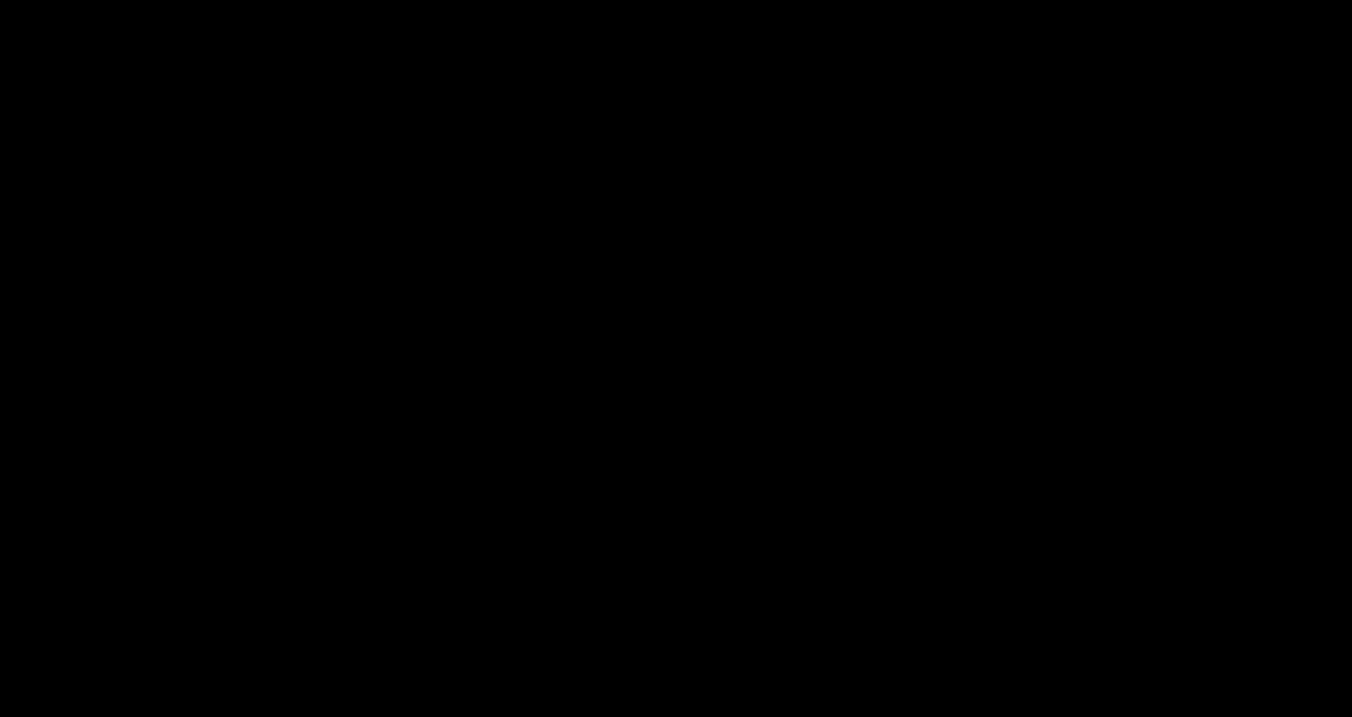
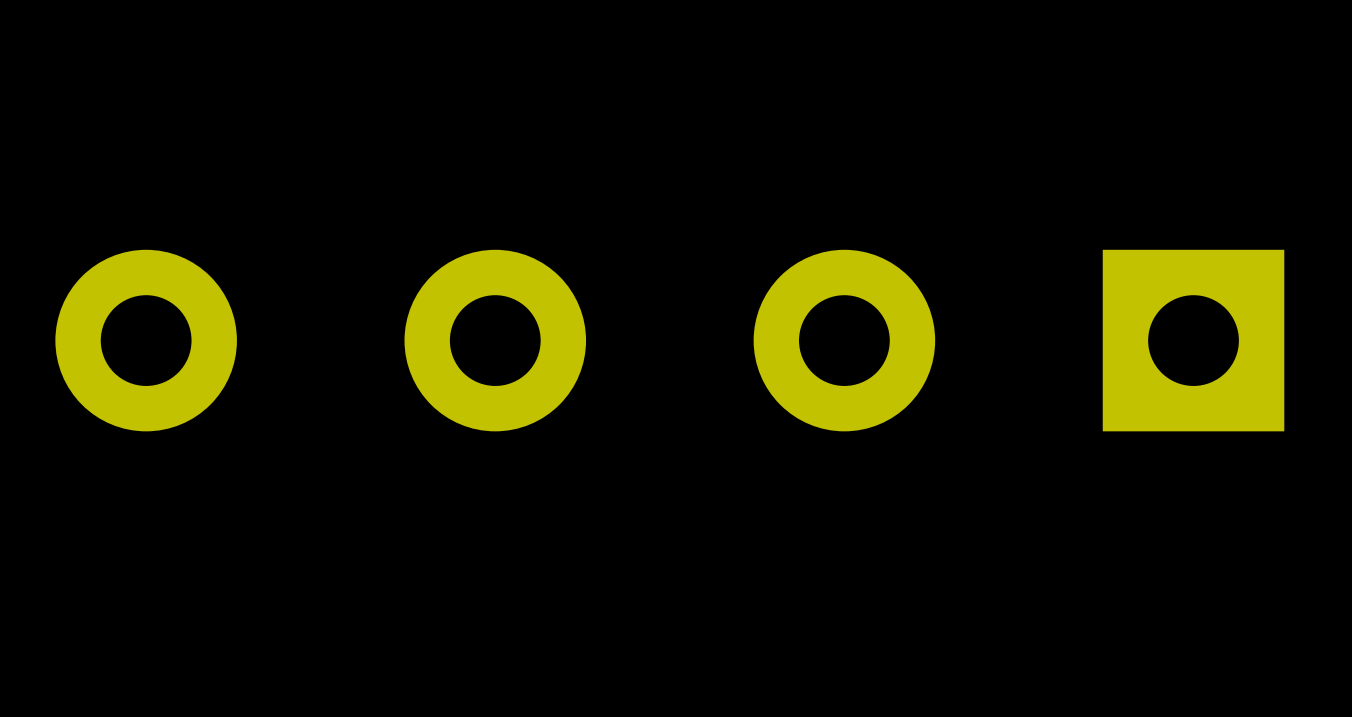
part: none -> (669, 340)

